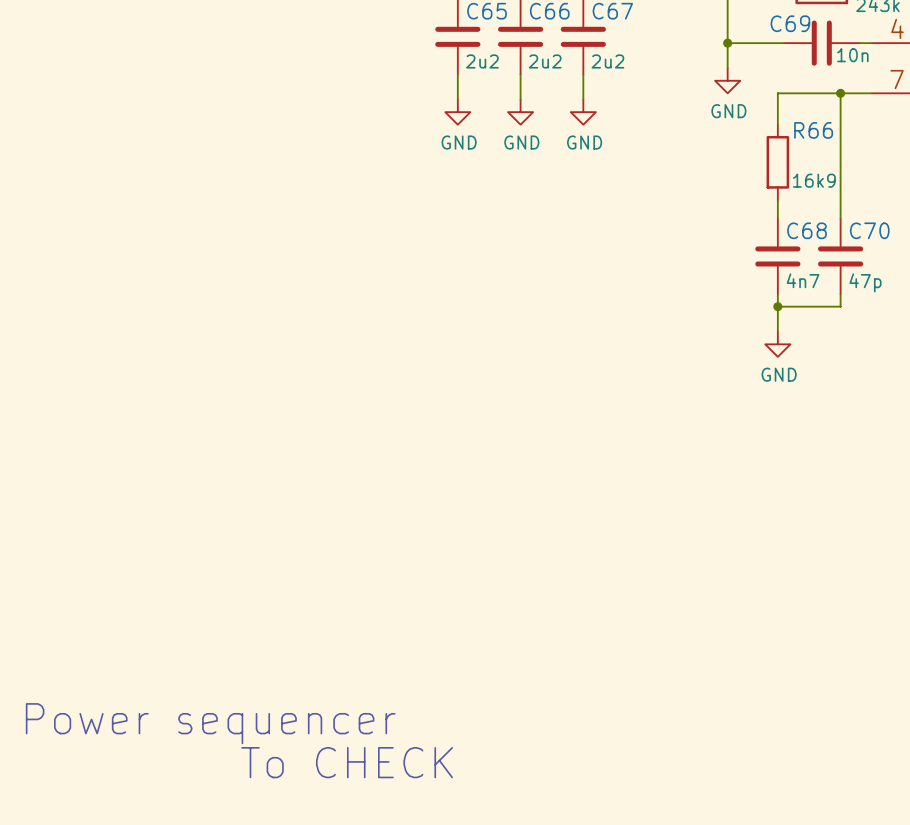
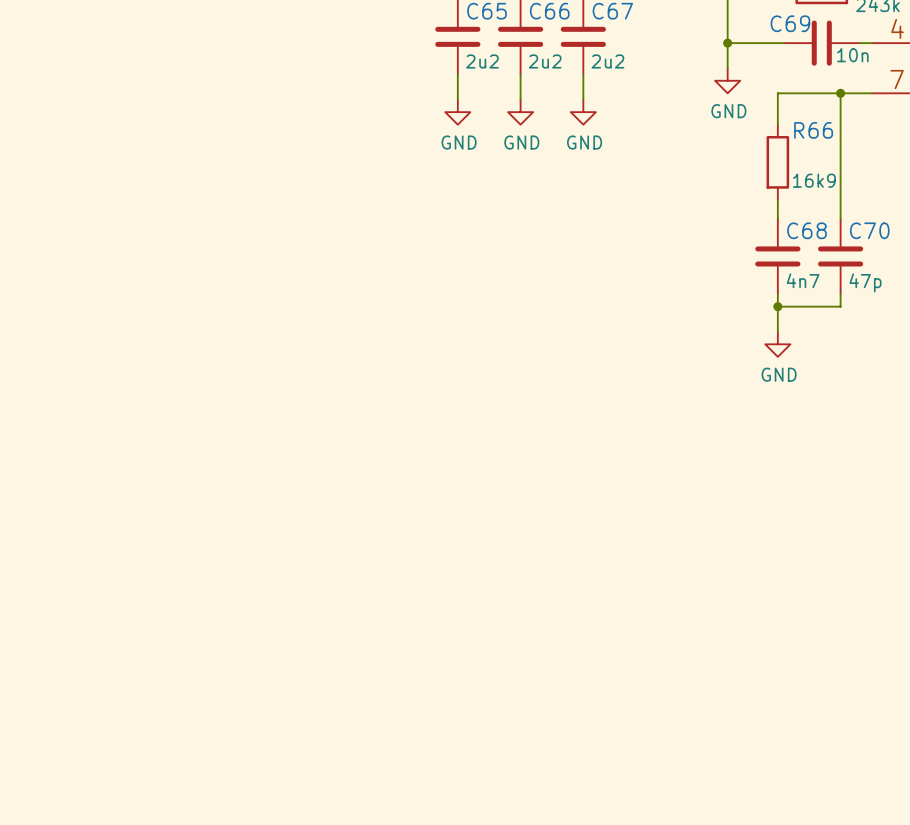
text: Power sequencer (210, 723) -> none
text: To CHECK (347, 762) -> none

